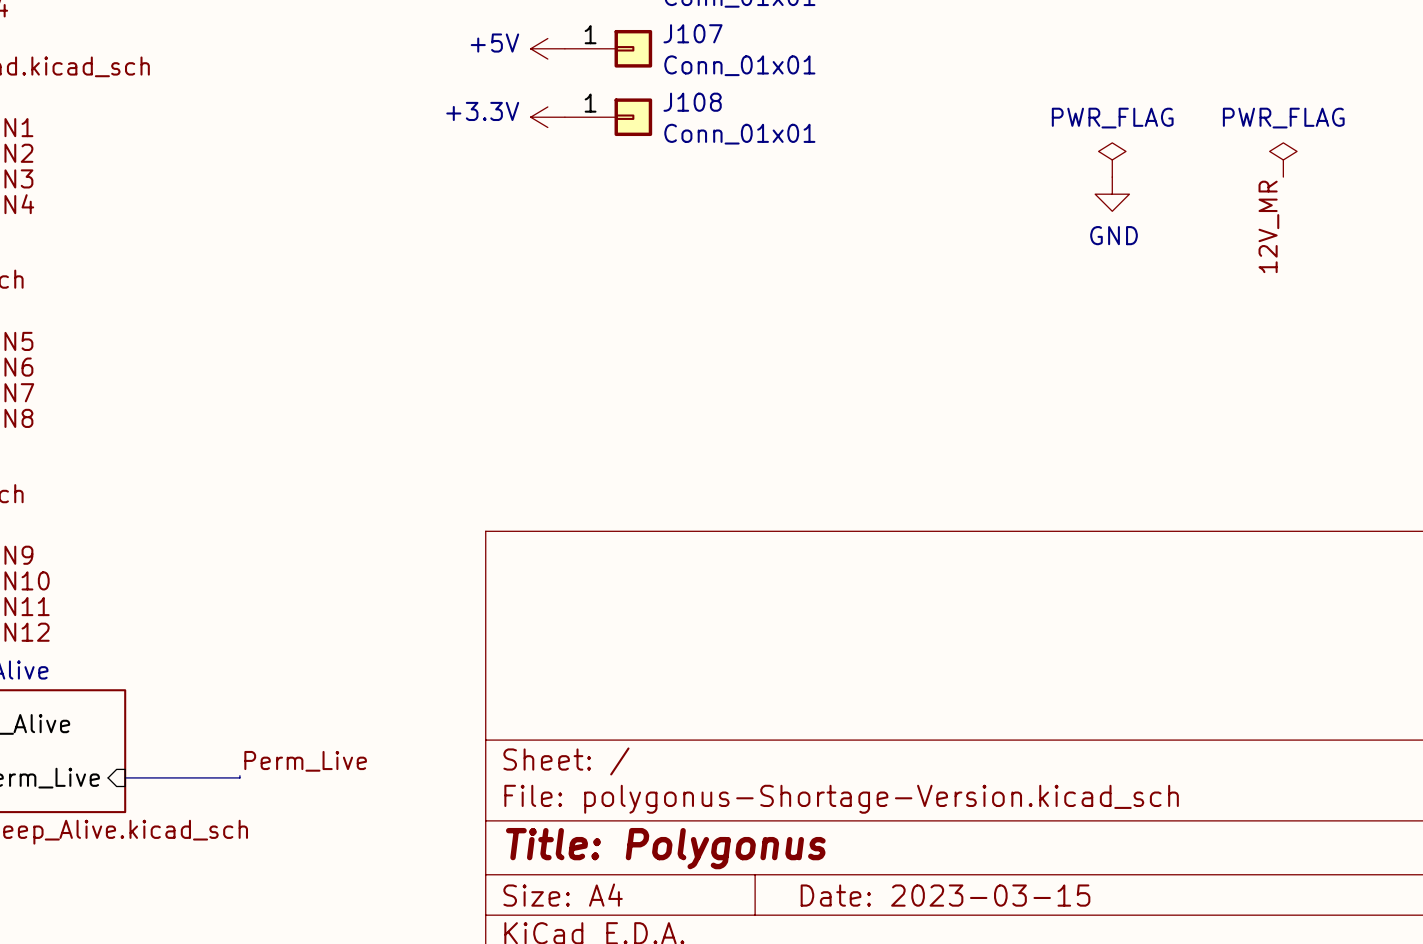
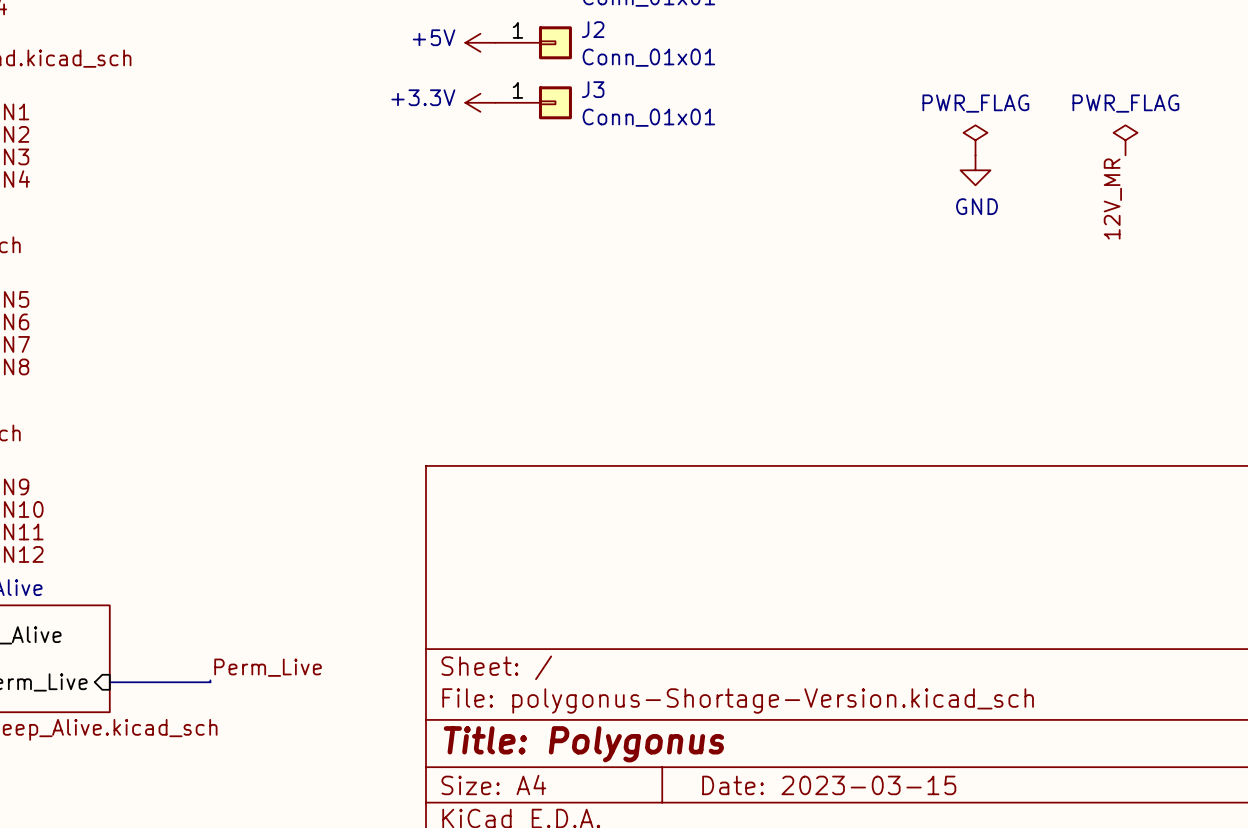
J107 name: J107 (693, 33) -> J2 (593, 29)
J108 name: J108 (692, 102) -> J3 (593, 89)

